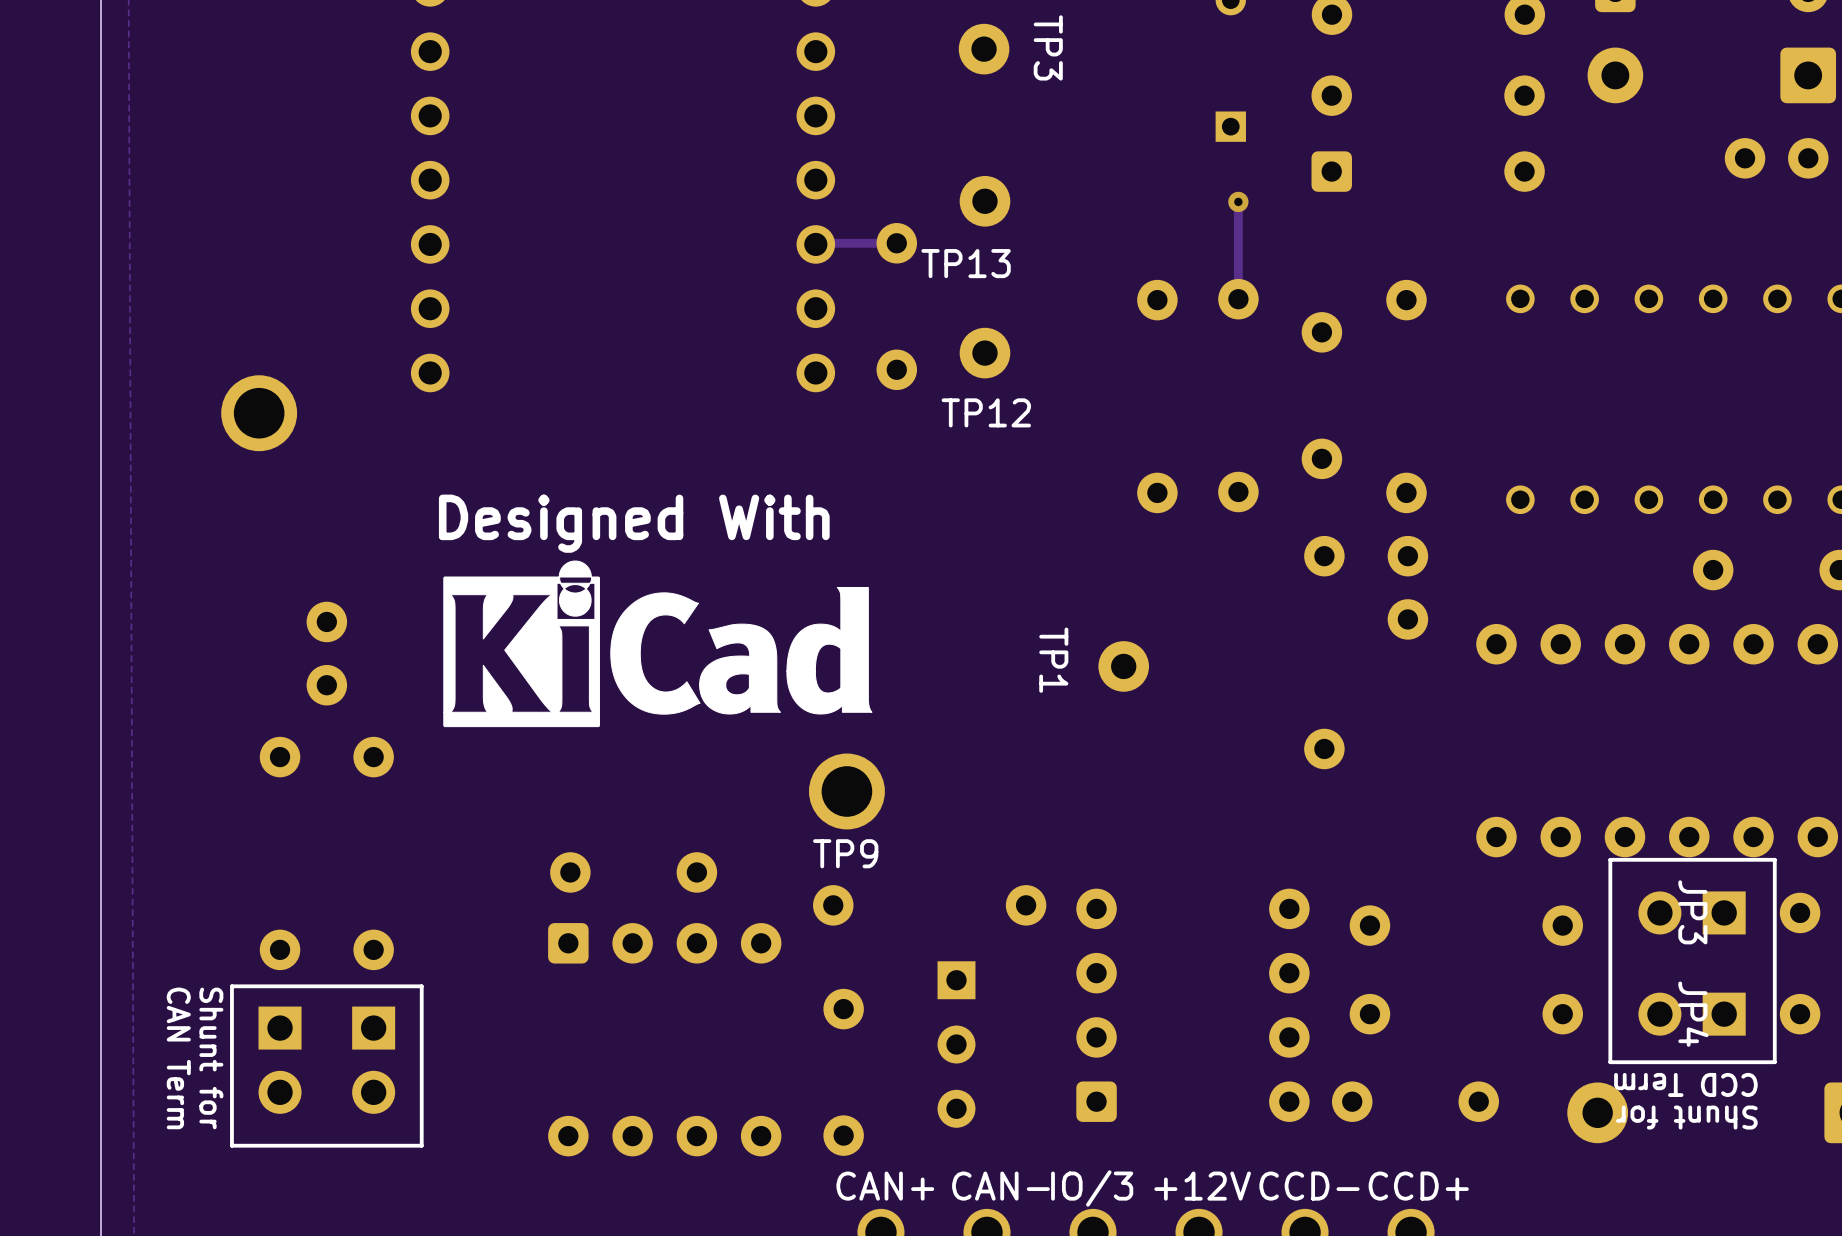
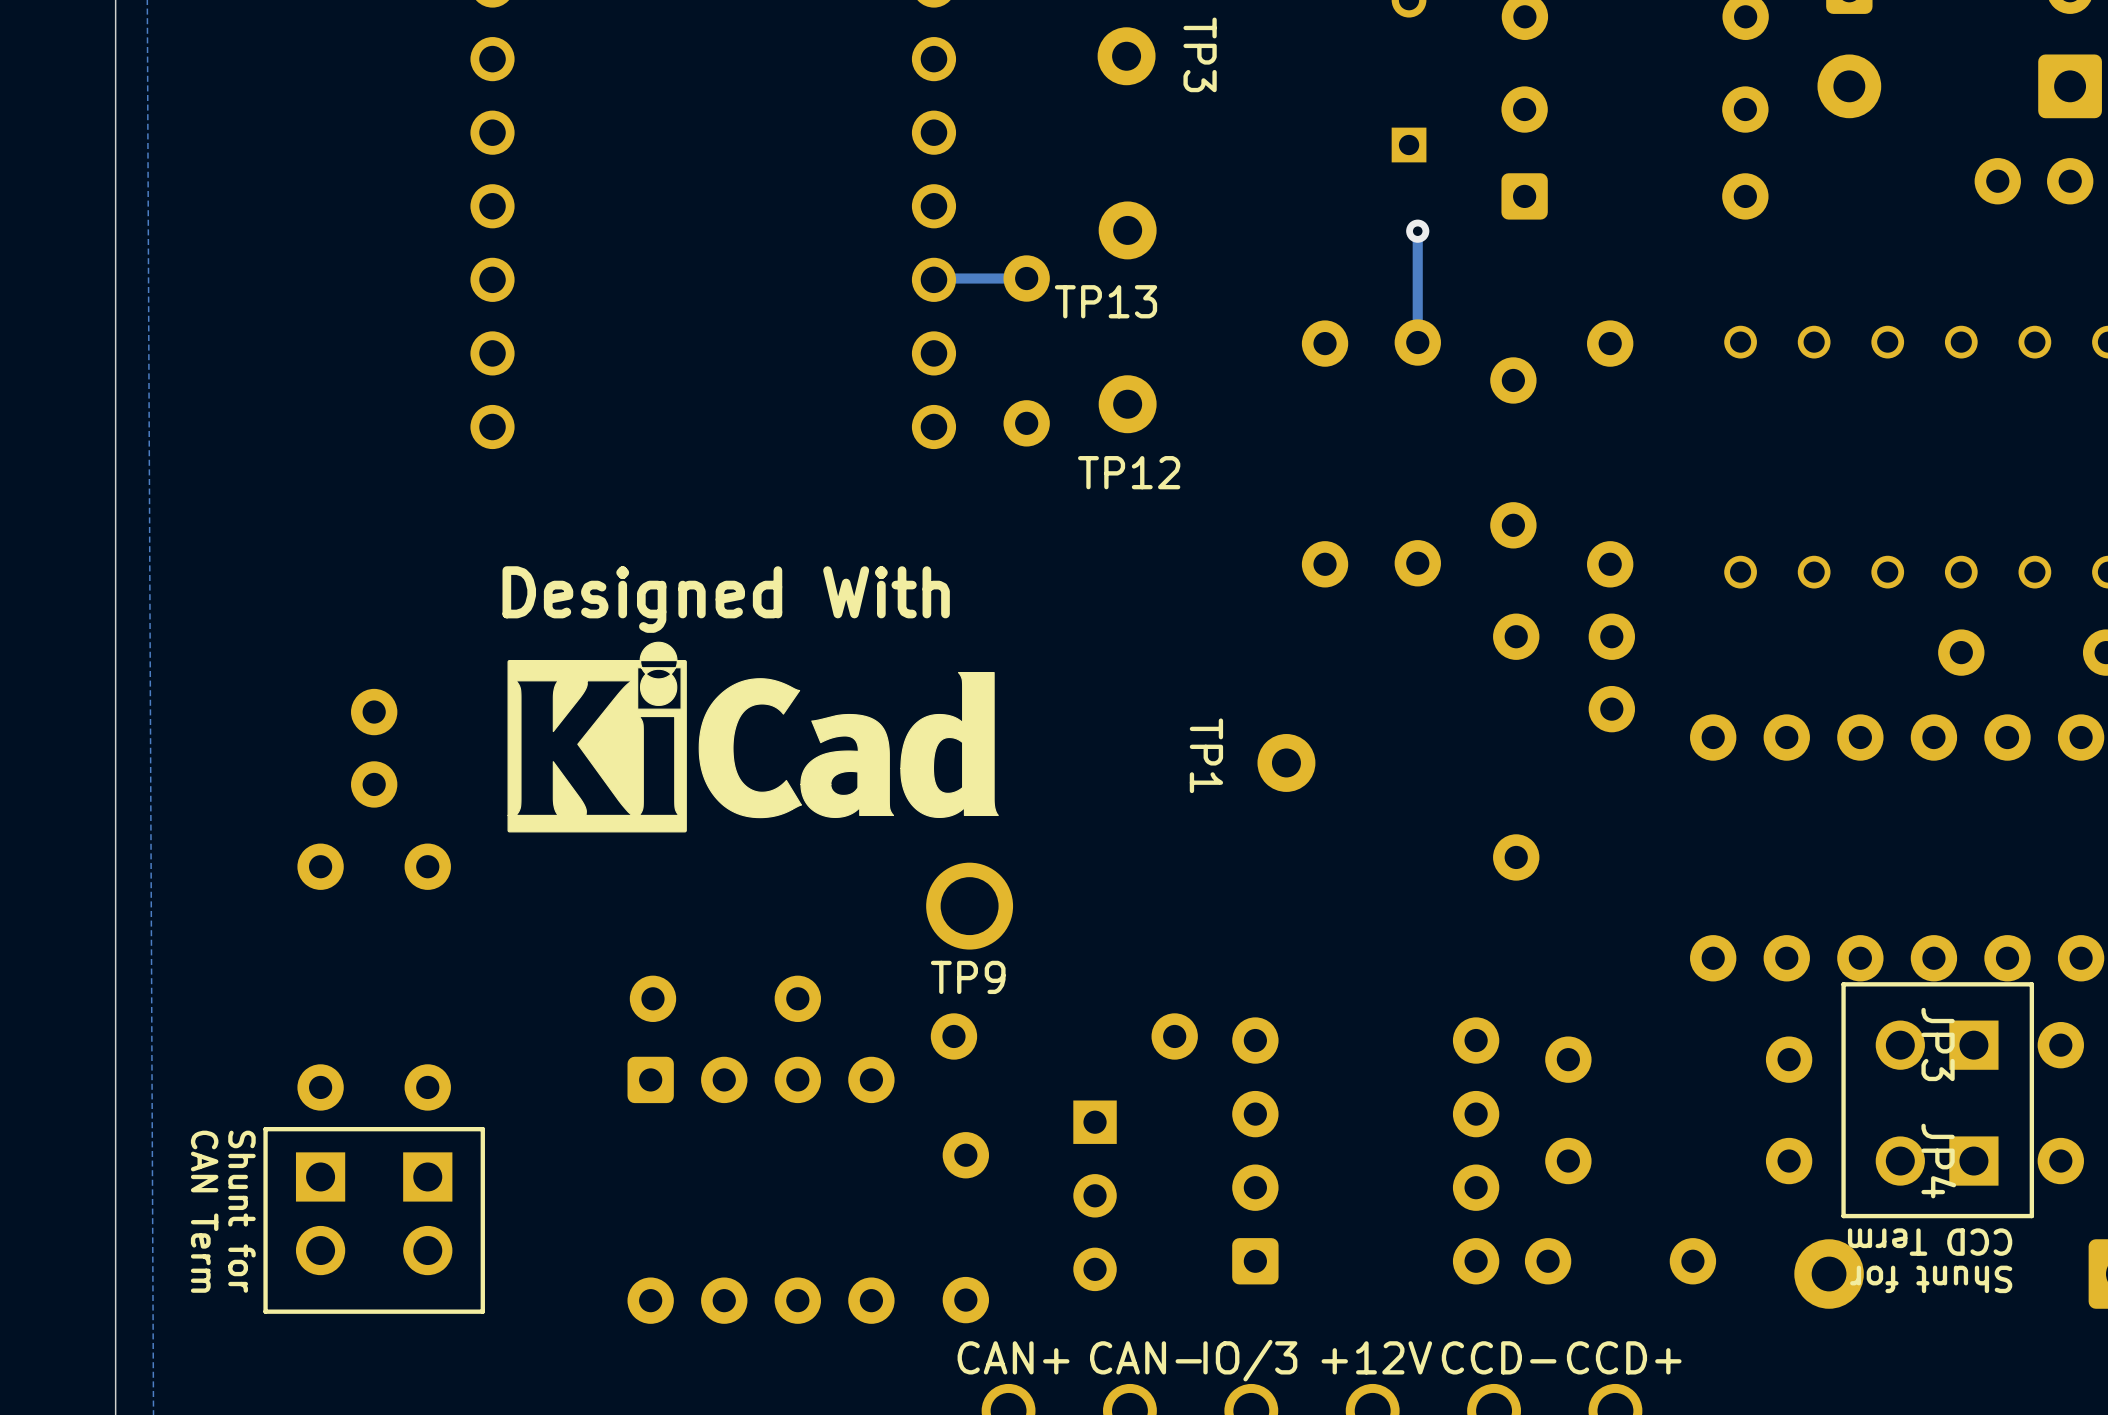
part: (259, 413) -> none

